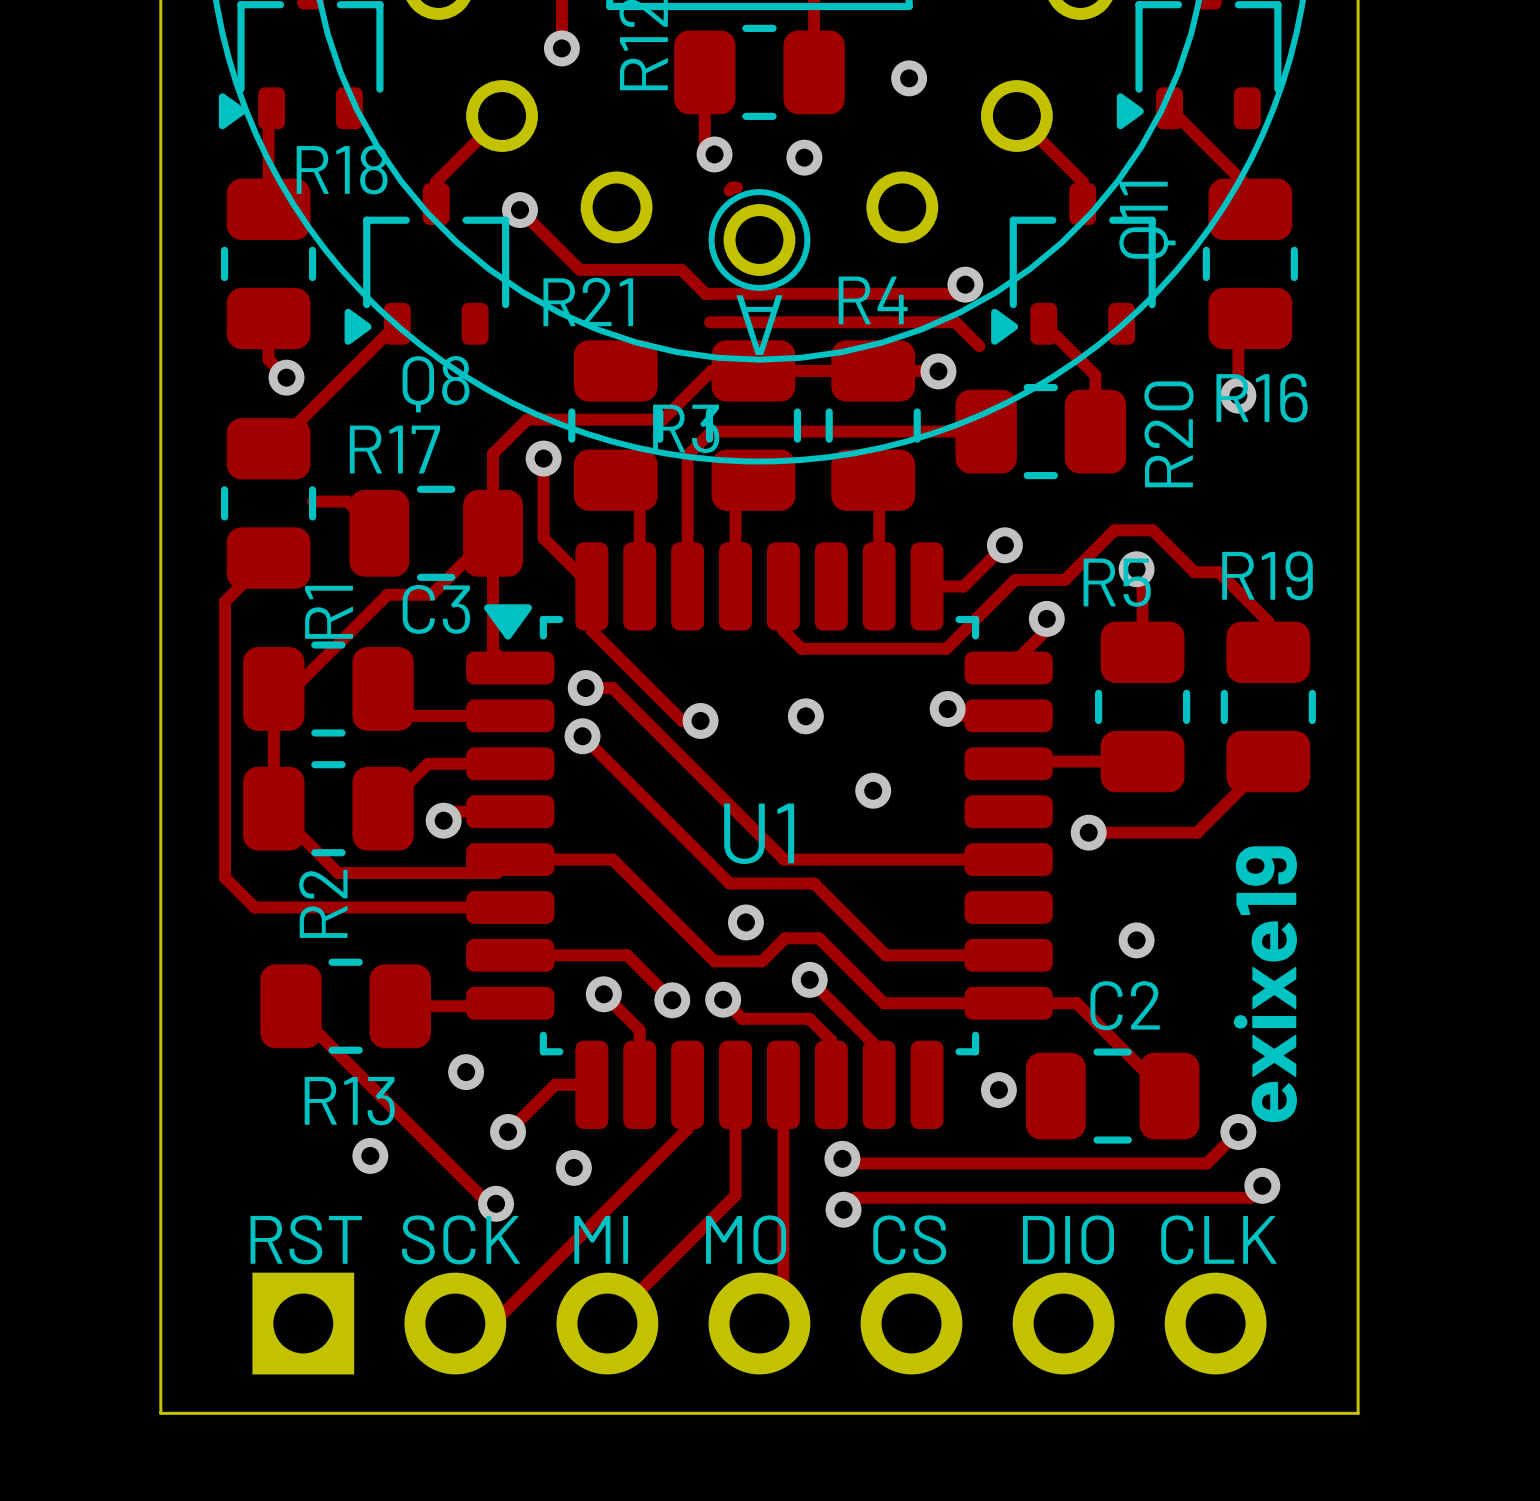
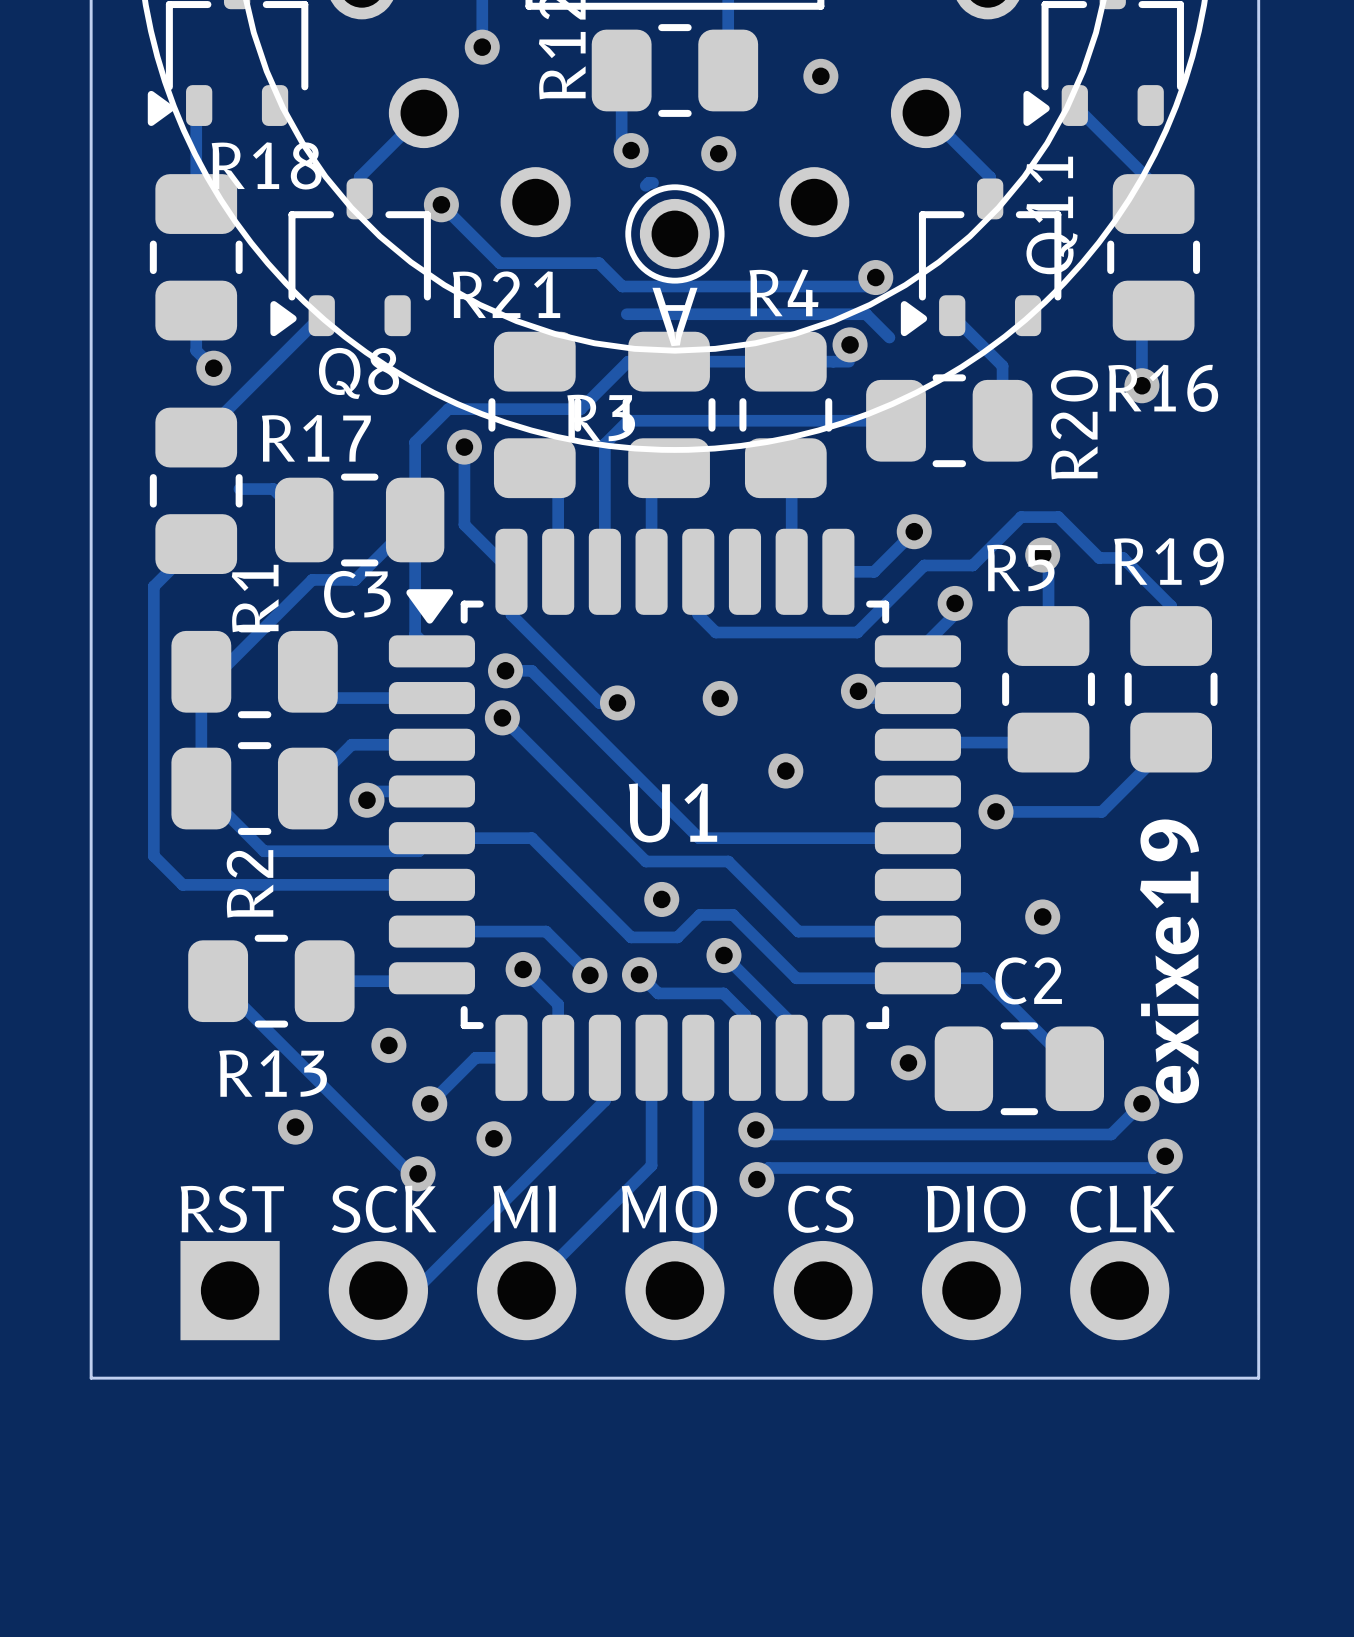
via position: (938, 371) -> (850, 344)

